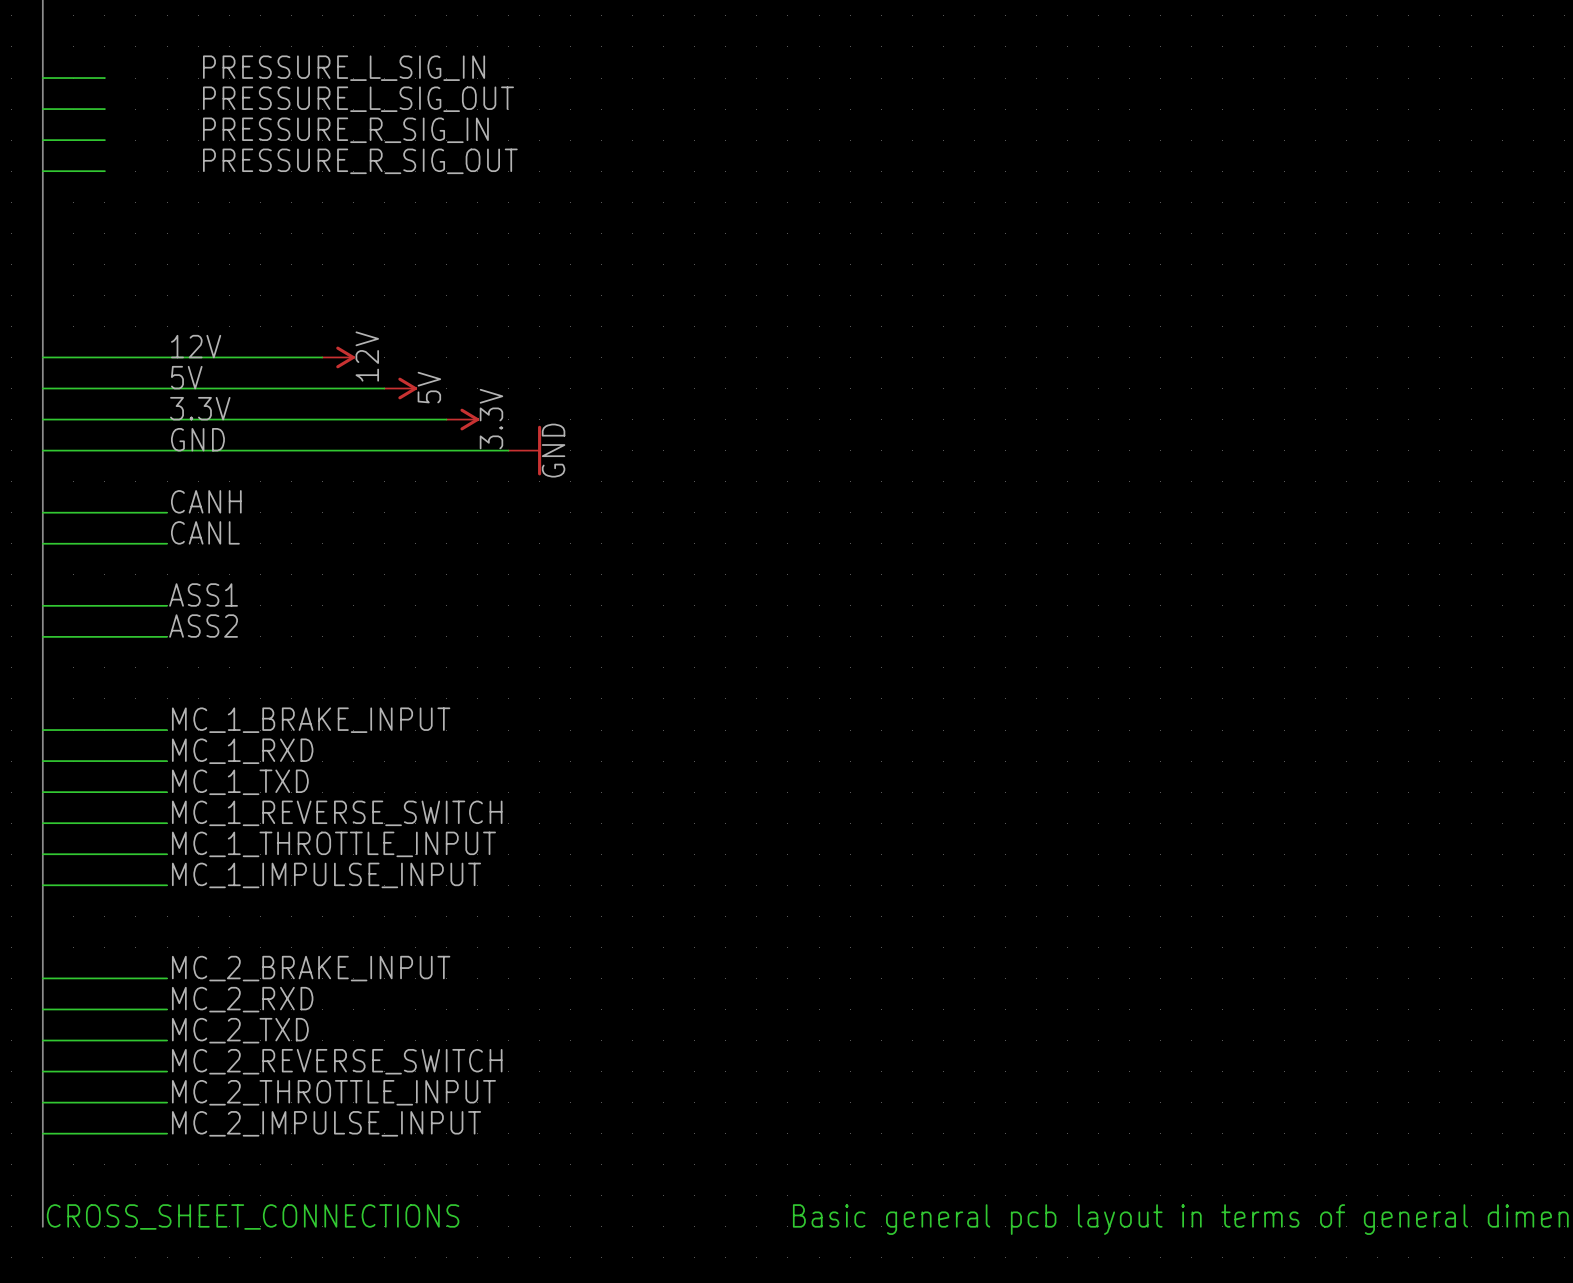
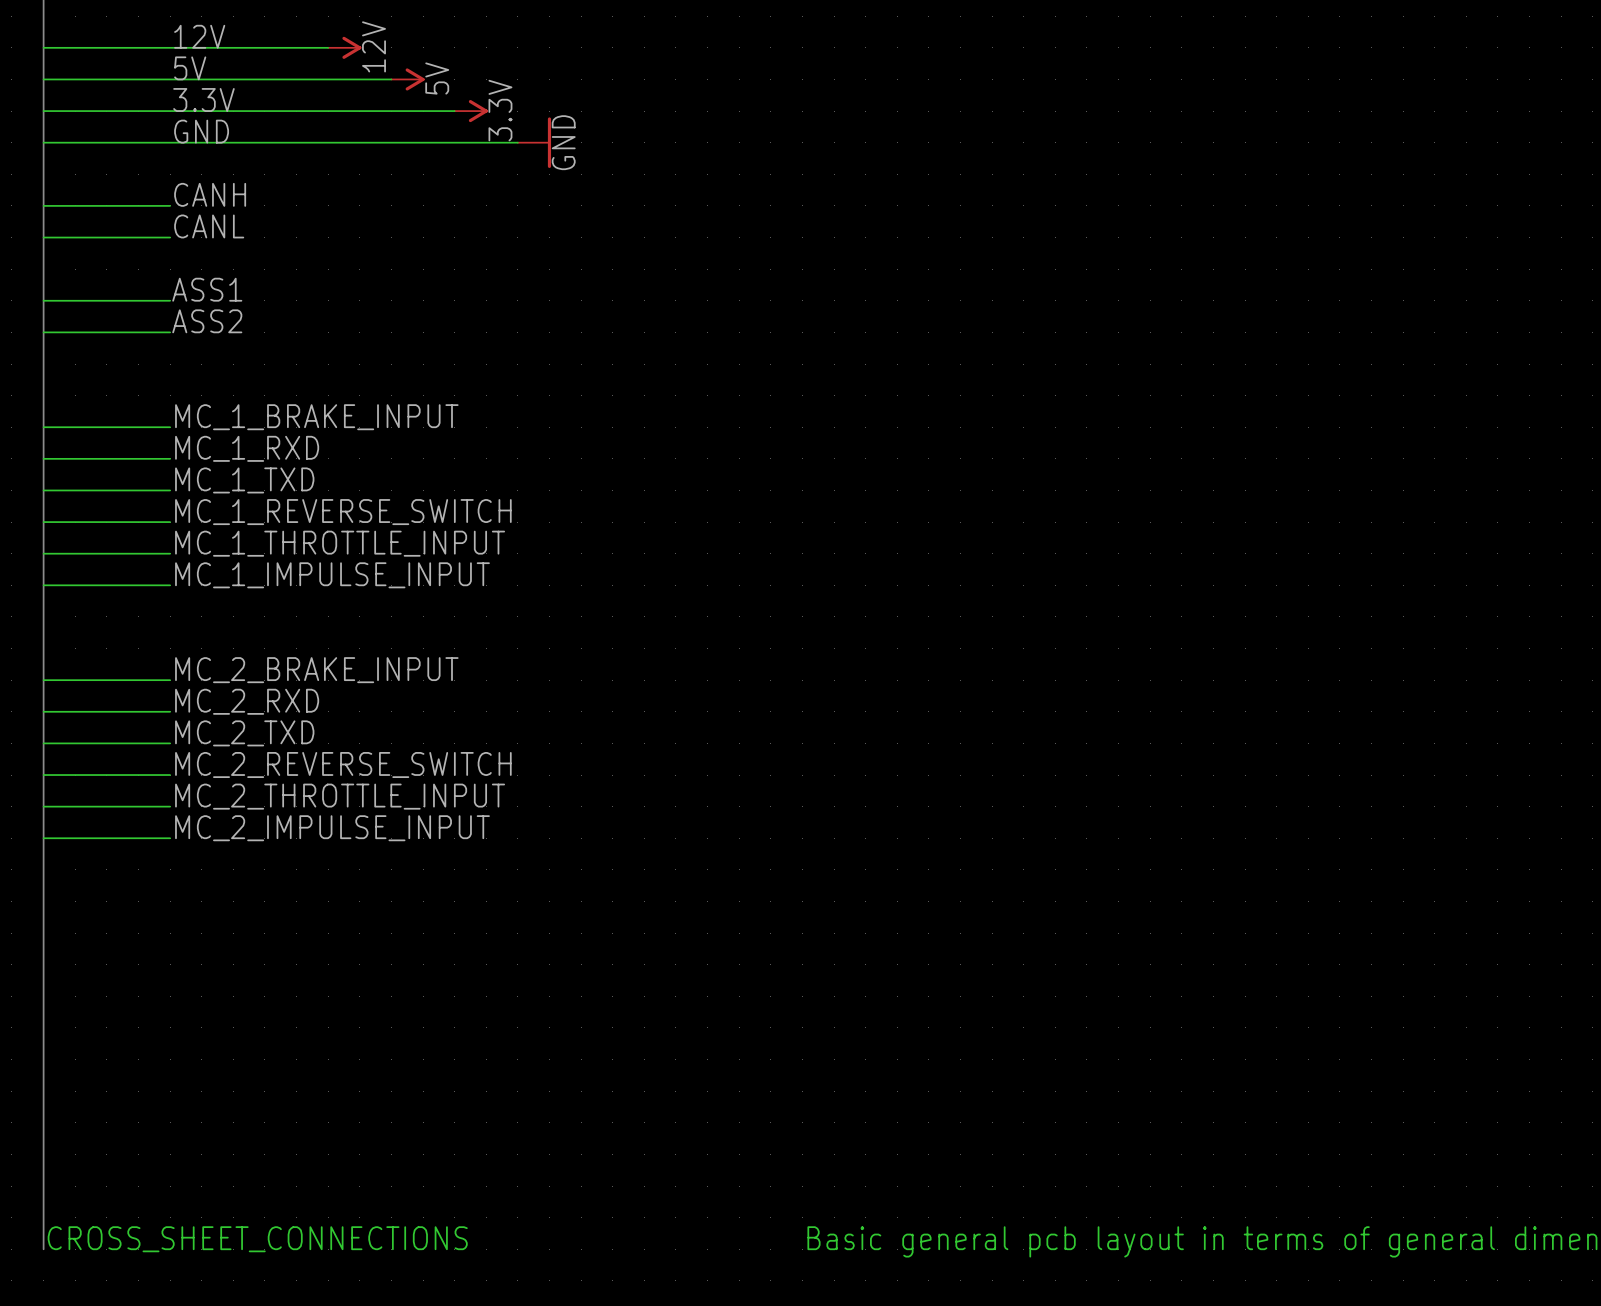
label: none -> 12V (199, 36)
wire: none -> (43, 47) (328, 47)
power symbol: none -> 12V (344, 47)
label: none -> 5V (190, 68)
label: PRESSURE_L_SIG_IN (344, 68) -> none
power symbol: none -> 5V (407, 79)
label: none -> 3.3V (203, 100)
label: PRESSURE_L_SIG_OUT (358, 99) -> none
power symbol: none -> 3.3V (471, 111)
label: none -> GND (201, 131)
label: PRESSURE_R_SIG_IN (345, 130) -> none
wire: none -> (106, 142) (517, 142)
power symbol: none -> GND (534, 142)
label: PRESSURE_R_SIG_OUT (360, 161) -> none
wire: (42, 171) (104, 171) -> none
label: none -> CANH (210, 194)
wire: none -> (43, 205) (170, 205)
label: none -> CANL (209, 226)
wire: none -> (43, 237) (170, 237)
label: none -> ASS1 (207, 289)
wire: none -> (43, 300) (170, 300)
label: none -> ASS2 (207, 321)
label: 12V (196, 346) -> none
wire: (42, 357) (322, 357) -> (106, 79) (391, 79)
power symbol: 12V (338, 357) -> none
label: 5V (186, 377) -> none
wire: (42, 388) (384, 388) -> (106, 111) (454, 111)
power symbol: 5V (400, 388) -> none
label: 3.3V (200, 408) -> MC_1_BRAKE_INPUT (316, 417)
wire: (167, 419) (446, 419) -> none
power symbol: 3.3V (462, 419) -> none
label: GND (197, 439) -> MC_1_RXD (247, 448)
wire: (167, 450) (508, 450) -> none
power symbol: GND (524, 450) -> none
label: none -> MC_1_TXD (244, 480)
label: CANH (206, 501) -> MC_1_REVERSE_SWITCH (343, 512)
label: CANL (205, 532) -> MC_1_THROTTLE_INPUT (340, 543)
label: none -> MC_1_IMPULSE_INPUT (332, 575)
label: ASS1 (203, 594) -> none
wire: (42, 605) (167, 605) -> (43, 332) (170, 332)
label: ASS2 (203, 626) -> none
wire: (42, 636) (167, 636) -> (43, 490) (170, 490)
label: none -> MC_2_BRAKE_INPUT (316, 670)
label: none -> MC_2_RXD (247, 701)
label: MC_1_BRAKE_INPUT (311, 720) -> MC_2_TXD (244, 733)
label: MC_1_RXD (242, 751) -> MC_2_REVERSE_SWITCH (343, 765)
label: MC_1_TXD (240, 782) -> MC_2_THROTTLE_INPUT (340, 796)
label: MC_1_REVERSE_SWITCH (337, 813) -> MC_2_IMPULSE_INPUT (332, 828)
label: MC_1_THROTTLE_INPUT (333, 844) -> none
wire: (42, 854) (167, 854) -> (43, 585) (170, 585)
label: MC_1_IMPULSE_INPUT (326, 875) -> none
wire: (42, 885) (167, 885) -> (43, 680) (170, 680)
label: MC_2_BRAKE_INPUT (311, 968) -> none
wire: (42, 978) (167, 978) -> (43, 711) (170, 711)
label: MC_2_RXD (242, 999) -> none
wire: (42, 1009) (167, 1009) -> none
label: MC_2_TXD (240, 1030) -> none
wire: (42, 1040) (167, 1040) -> none
label: MC_2_REVERSE_SWITCH (337, 1061) -> none
wire: (42, 1071) (167, 1071) -> none
label: MC_2_THROTTLE_INPUT (333, 1092) -> none
wire: (42, 1102) (167, 1102) -> none
label: MC_2_IMPULSE_INPUT (326, 1123) -> none
wire: (42, 1133) (167, 1133) -> none

